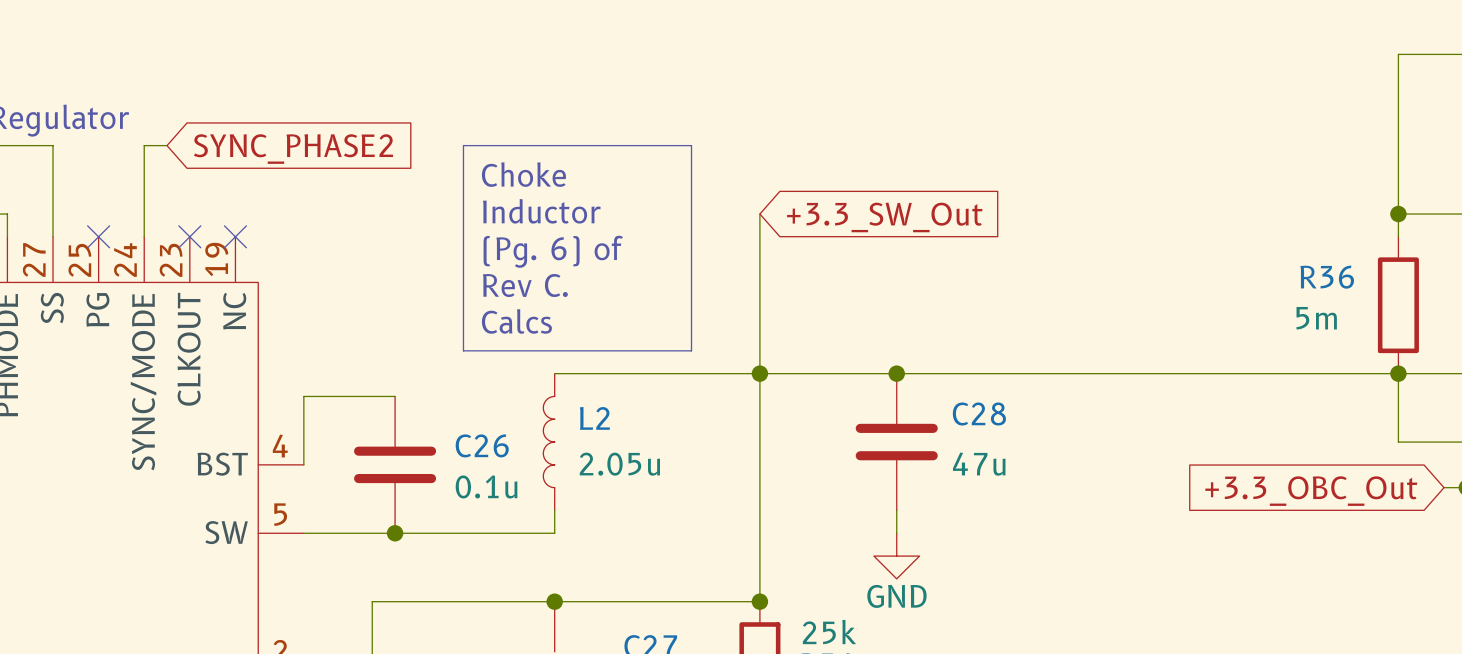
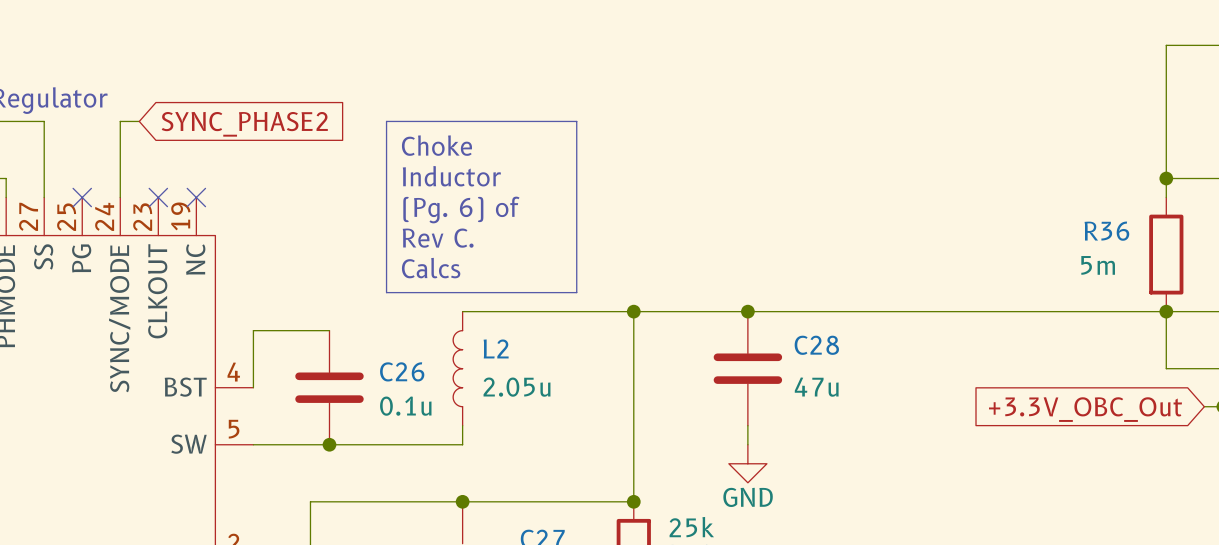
wire: (759, 214) (759, 373) -> none
global label: +3.3_SW_Out (884, 217) -> none
global label: +3.3_OBC_Out (1311, 491) -> +3.3V_OBC_Out (1085, 409)

